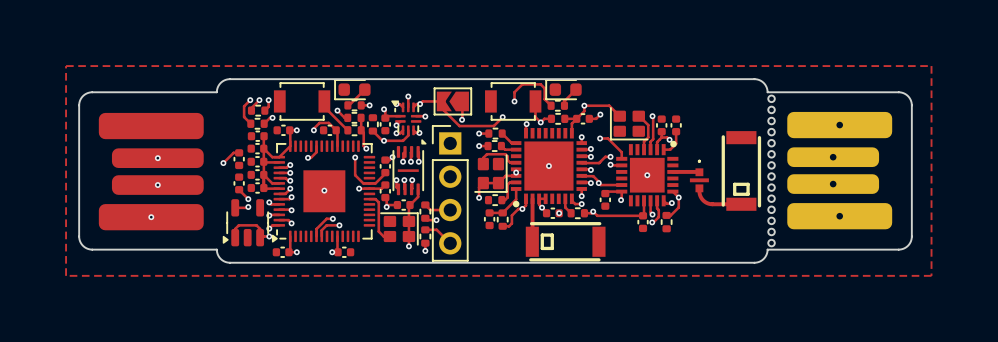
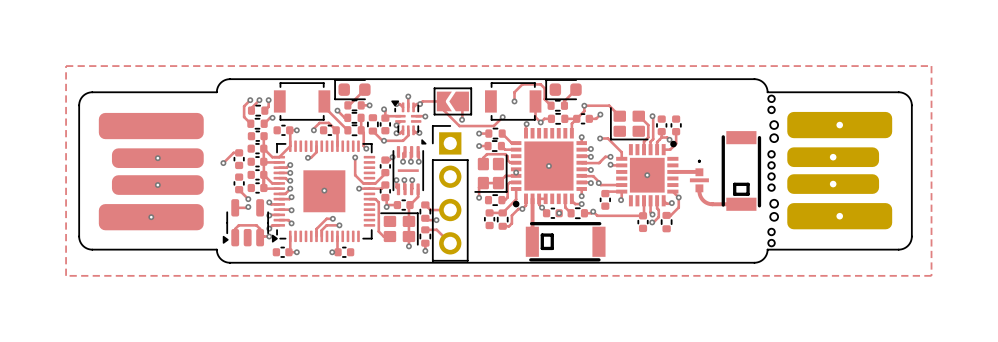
round board edge: [767, 117, 776, 125] -> none
round board edge: none -> [769, 120, 779, 130]
round board edge: [767, 128, 776, 136] -> none
round board edge: none -> [769, 133, 779, 143]
round board edge: [767, 139, 776, 147] -> none
round board edge: [767, 195, 776, 203] -> none
round board edge: none -> [769, 199, 779, 209]
round board edge: [767, 206, 776, 214] -> none
round board edge: none -> [769, 212, 779, 222]
round board edge: [767, 217, 776, 225] -> none

